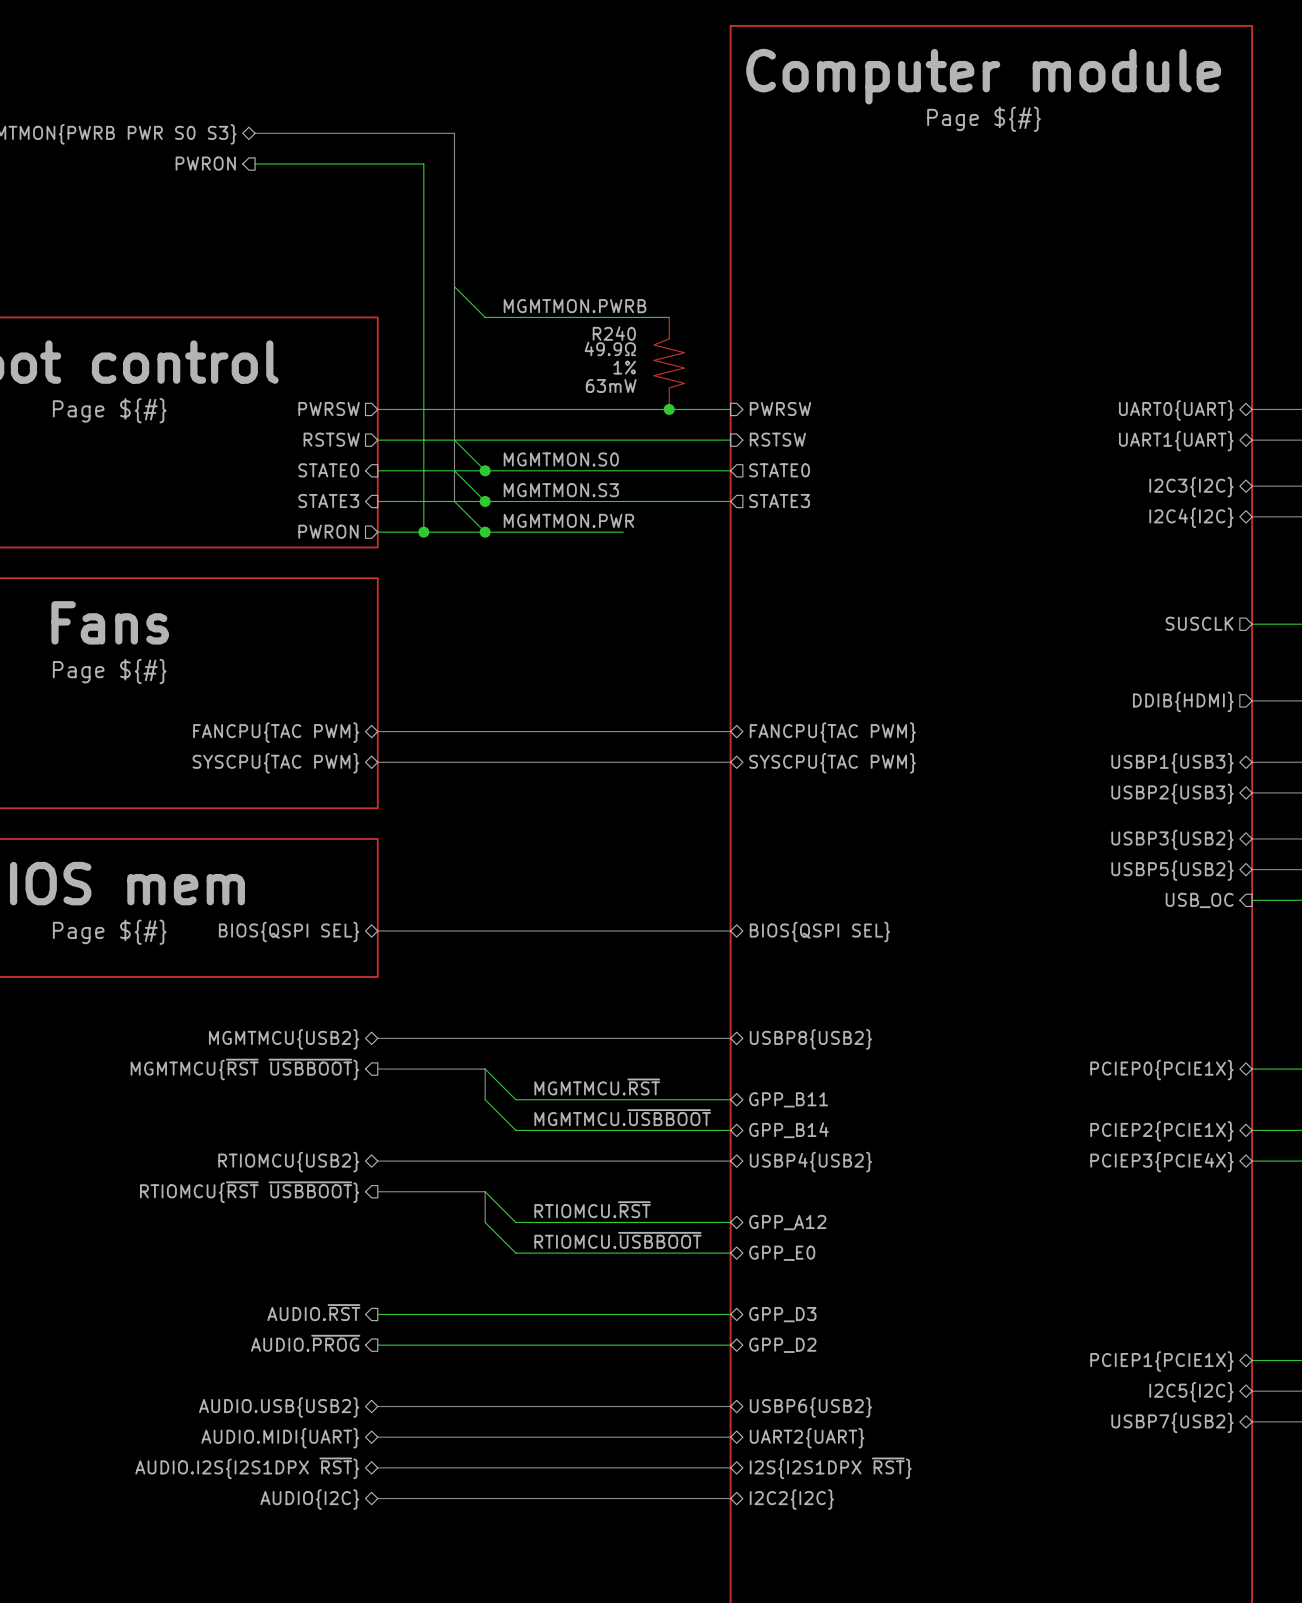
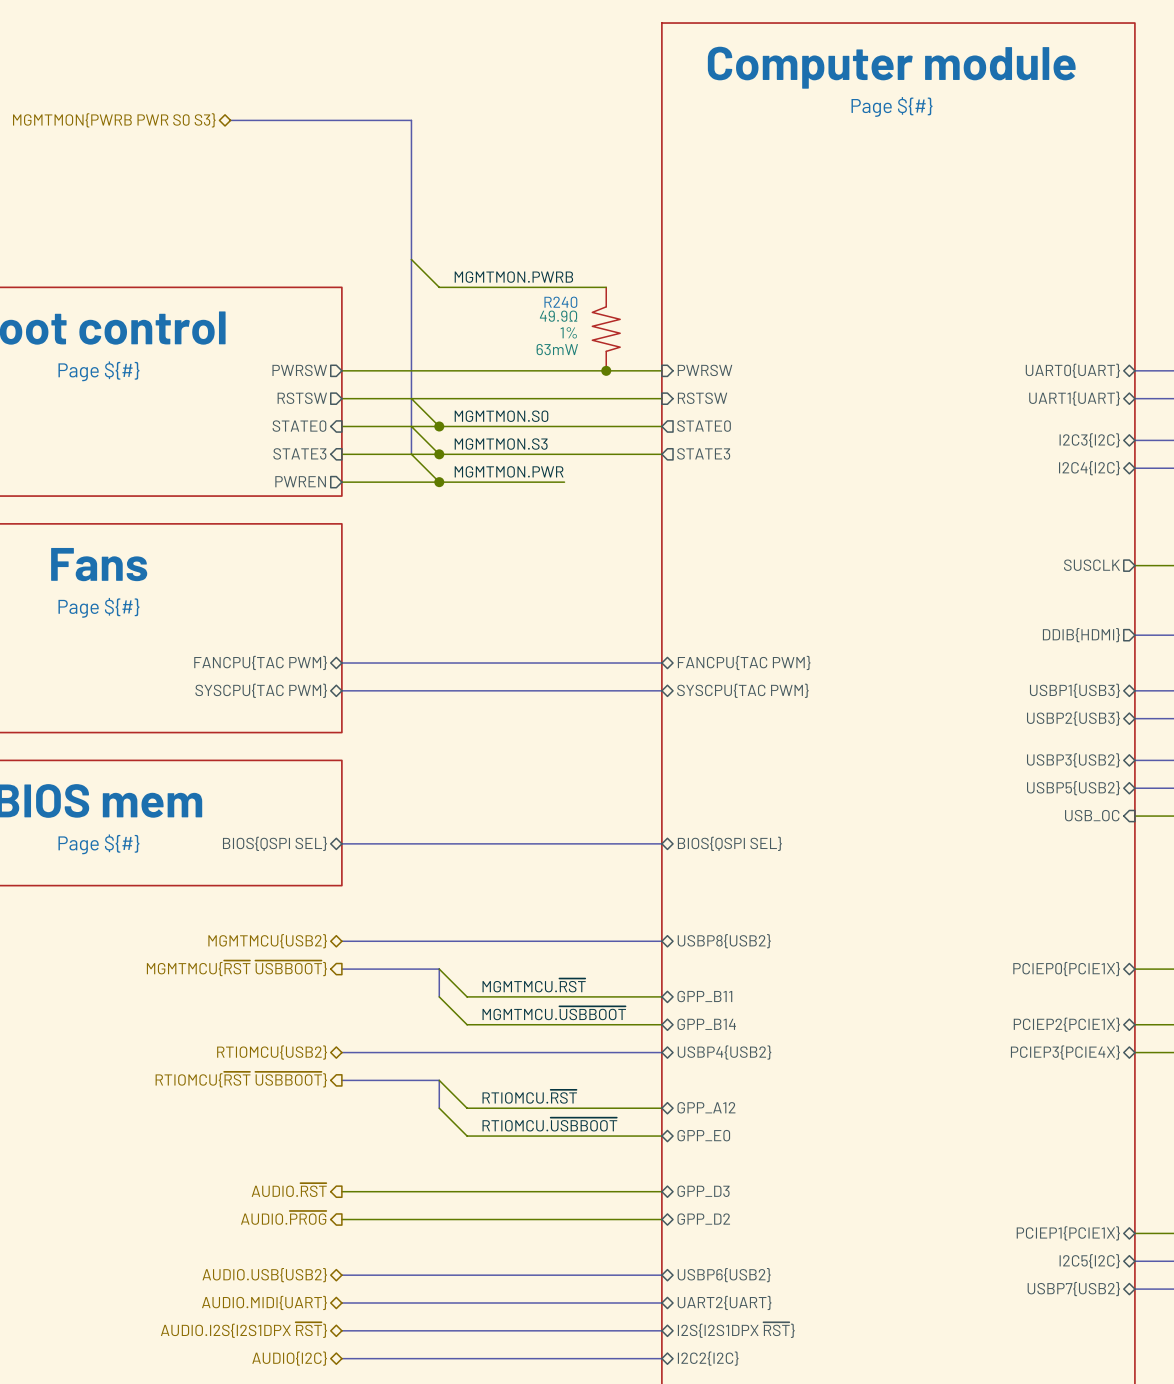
hierarchical label: PWRON (205, 163) -> none
wire: (255, 164) (423, 164) (423, 532) -> none
sheet pin: PWRON (328, 531) -> PWREN (300, 481)
junction: (423, 532) -> none

